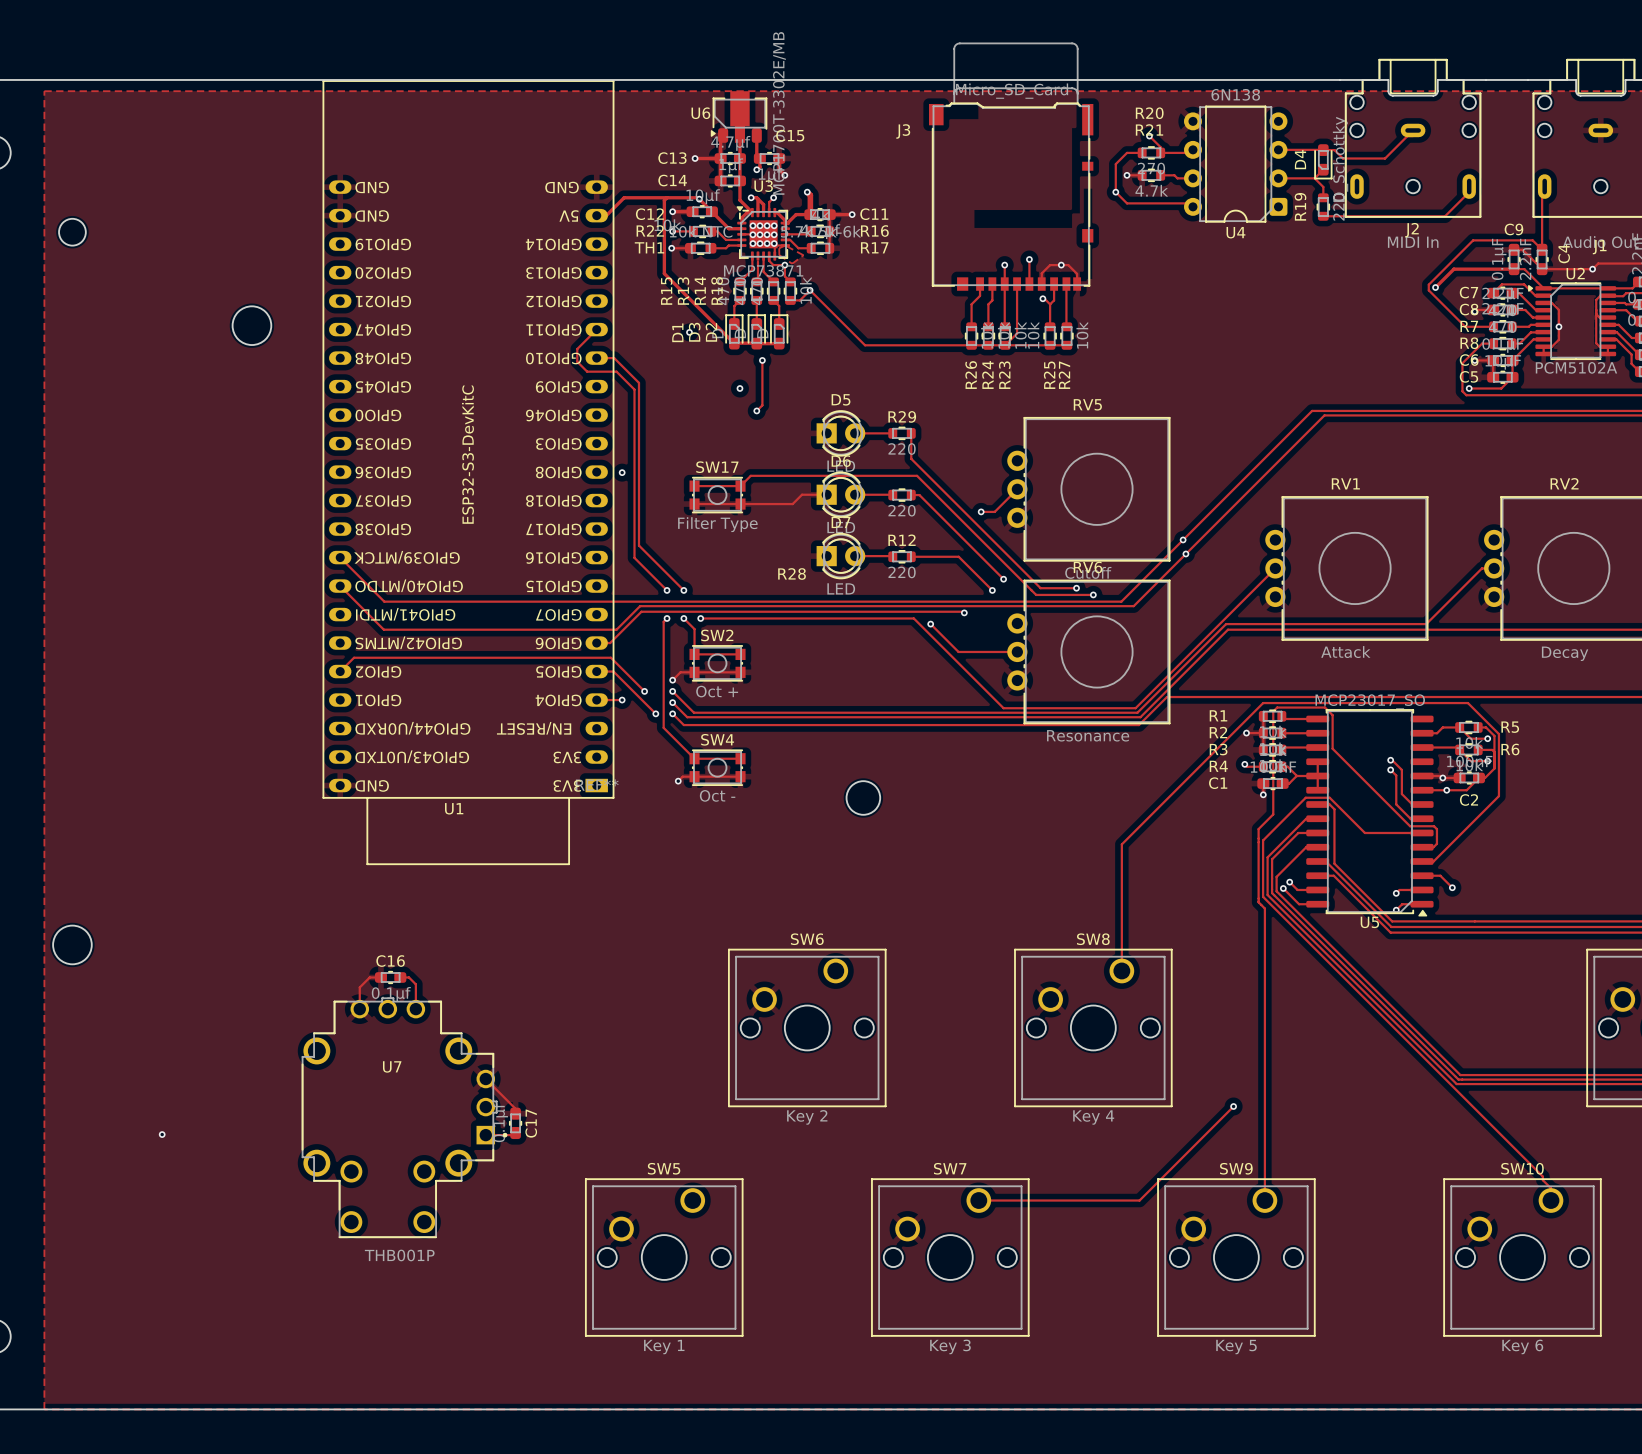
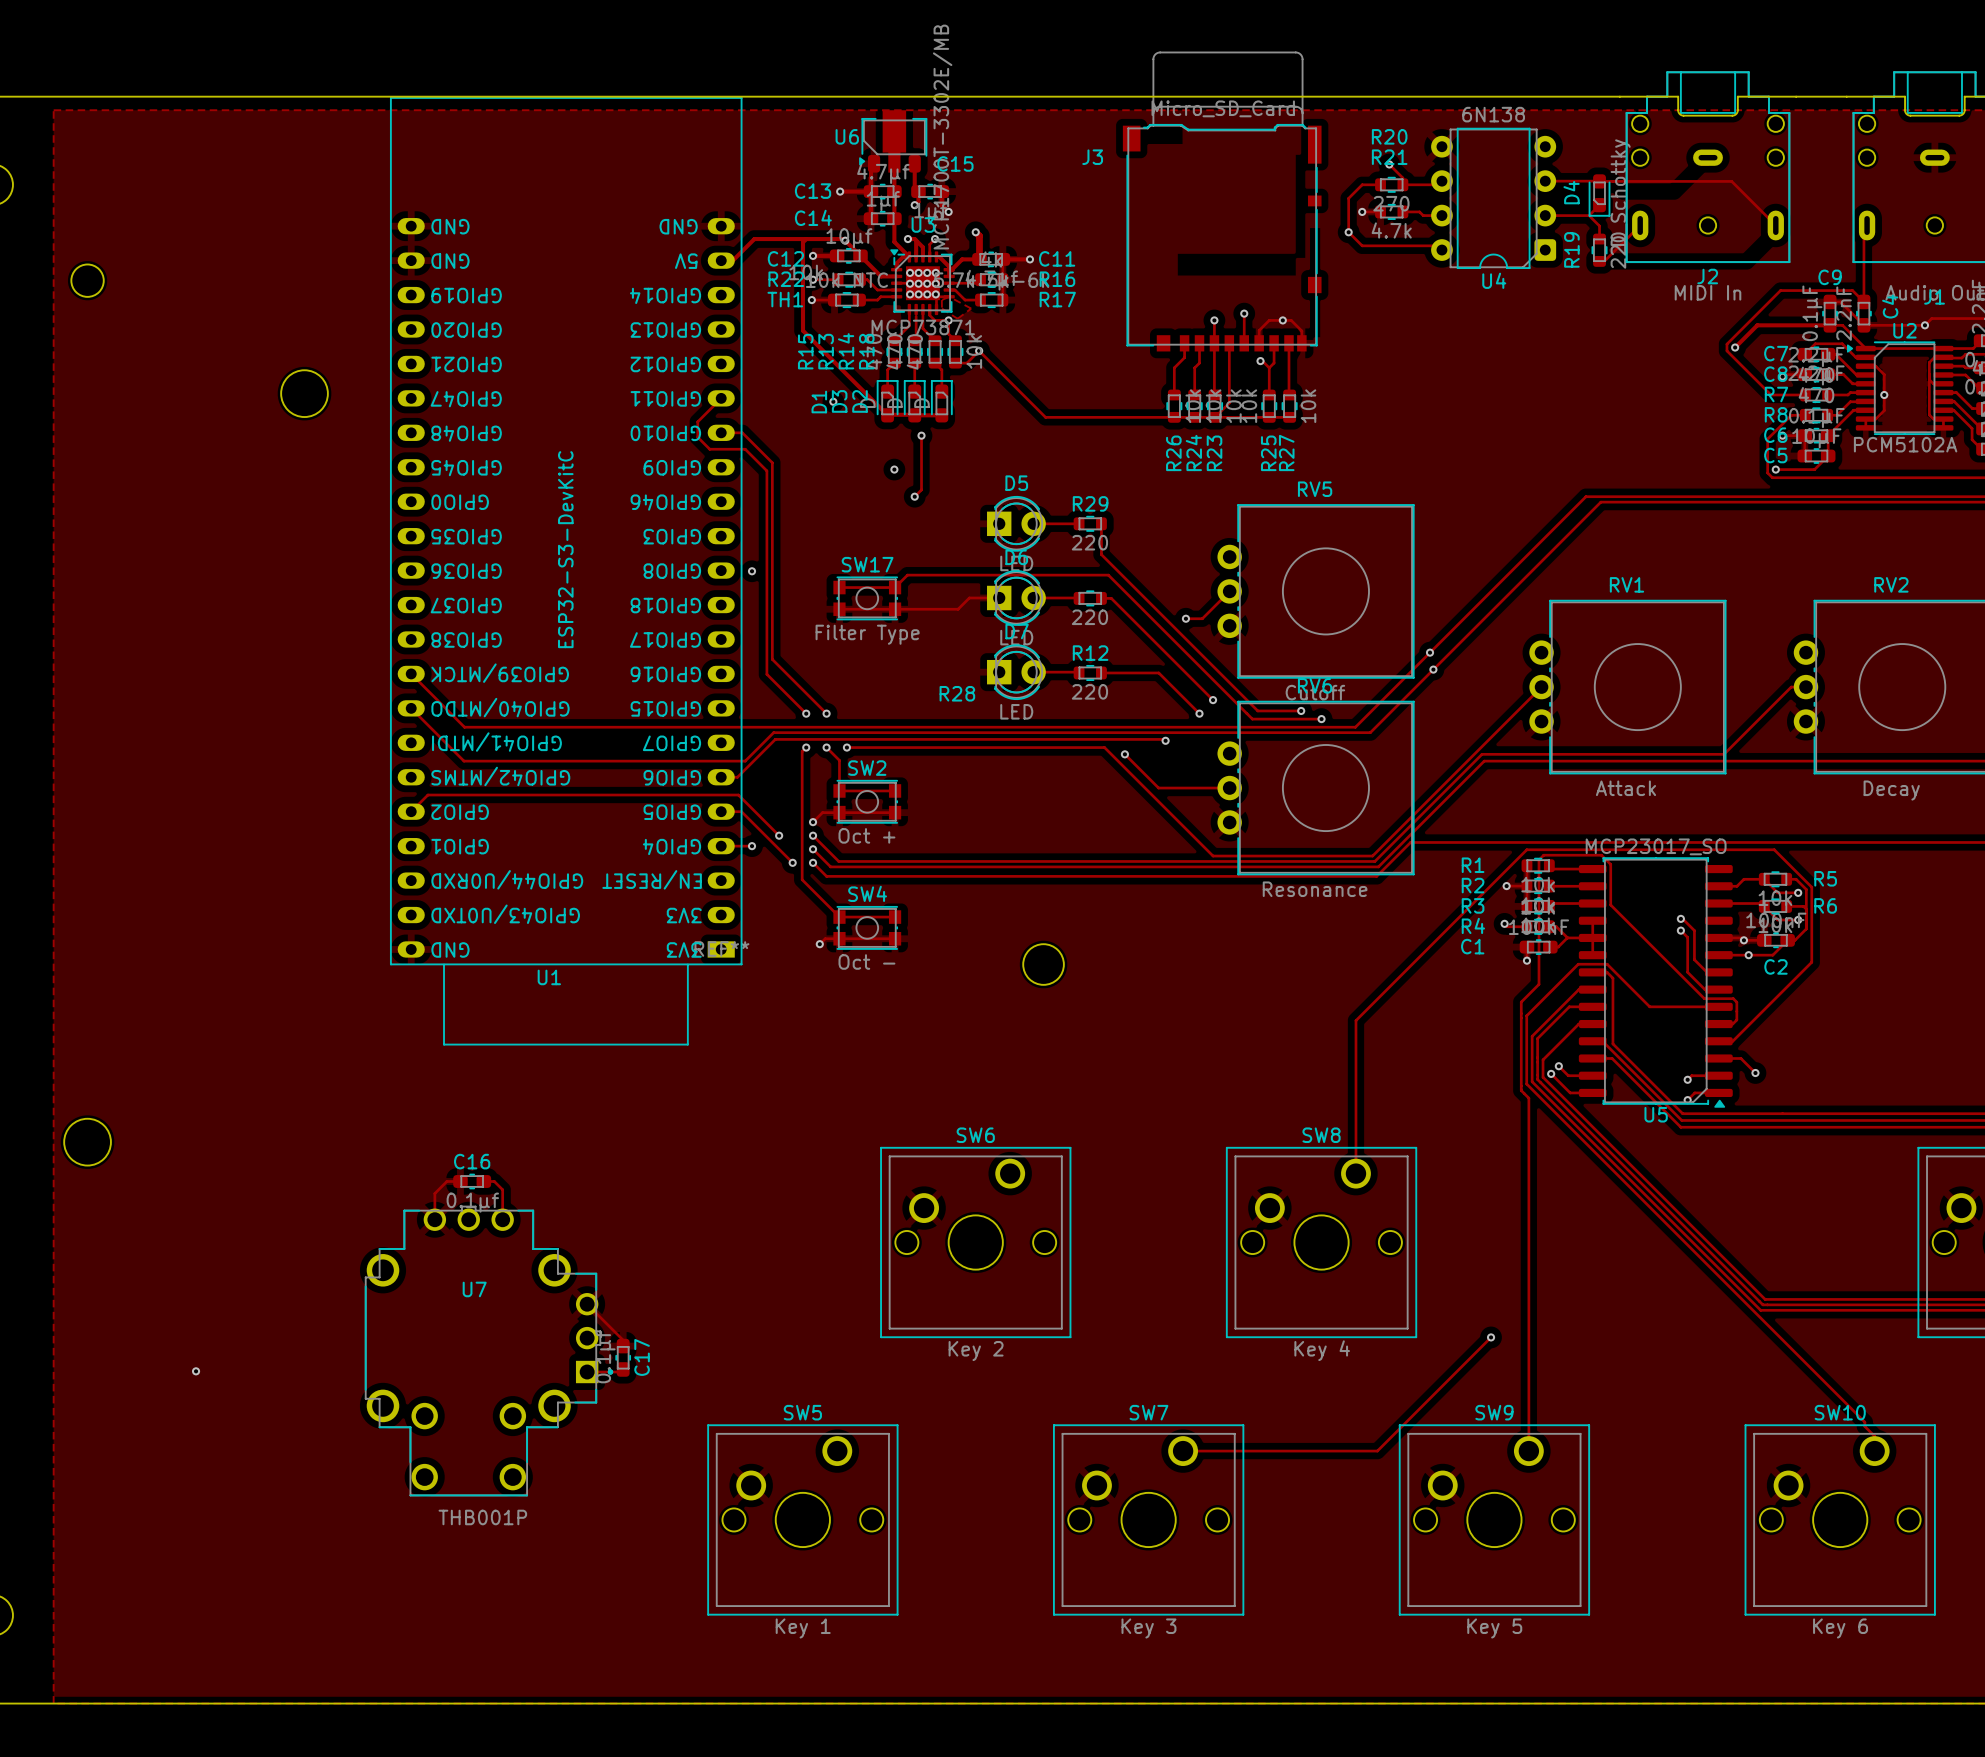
track: (1407, 136) (1385, 158) (1342, 158) (1334, 150) -> (1775, 225) (1731, 181) (1613, 181)
track: (1469, 192) (1445, 216) (1327, 216) -> (1640, 225) (1604, 261)

